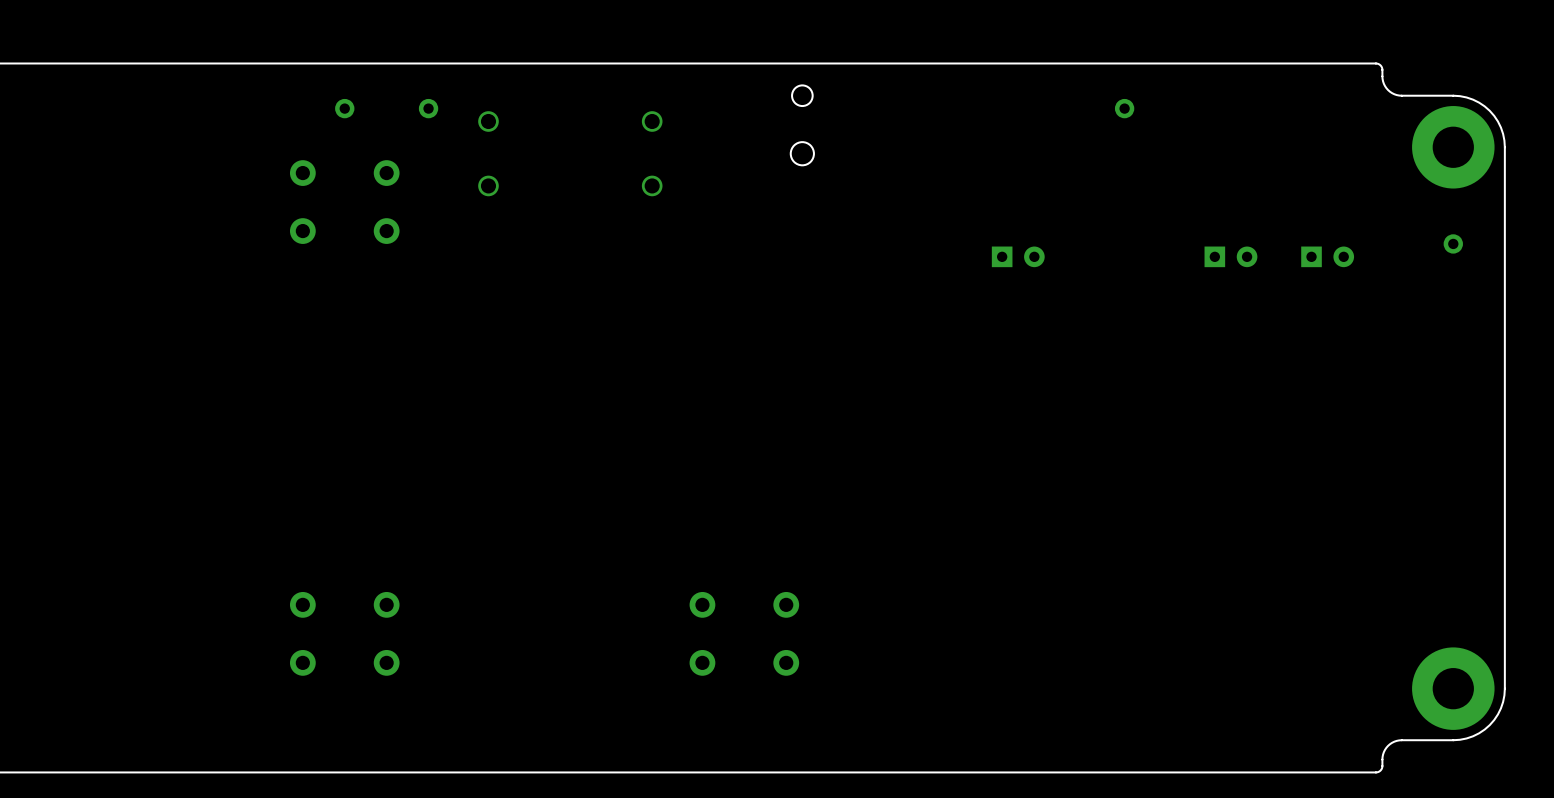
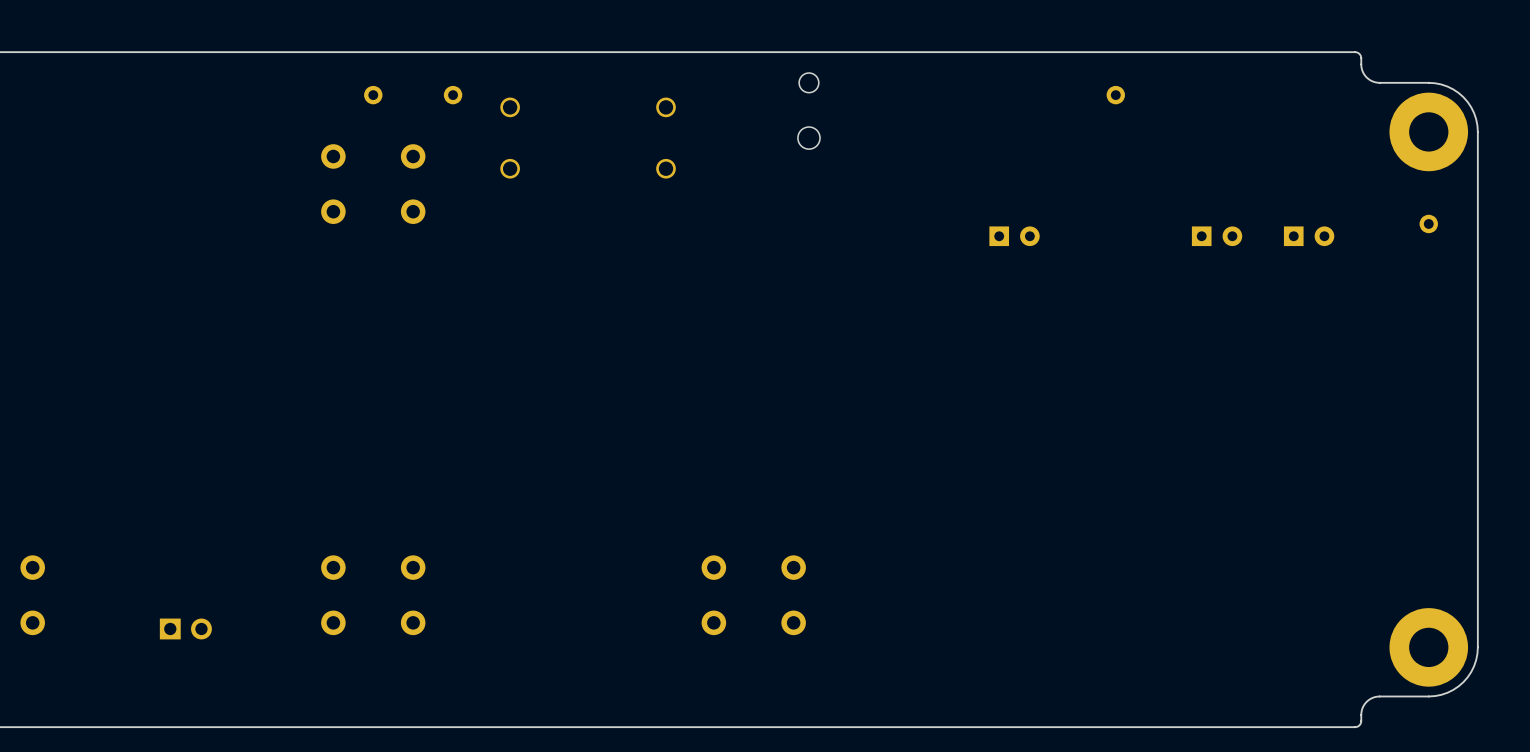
part: none -> (185, 628)

